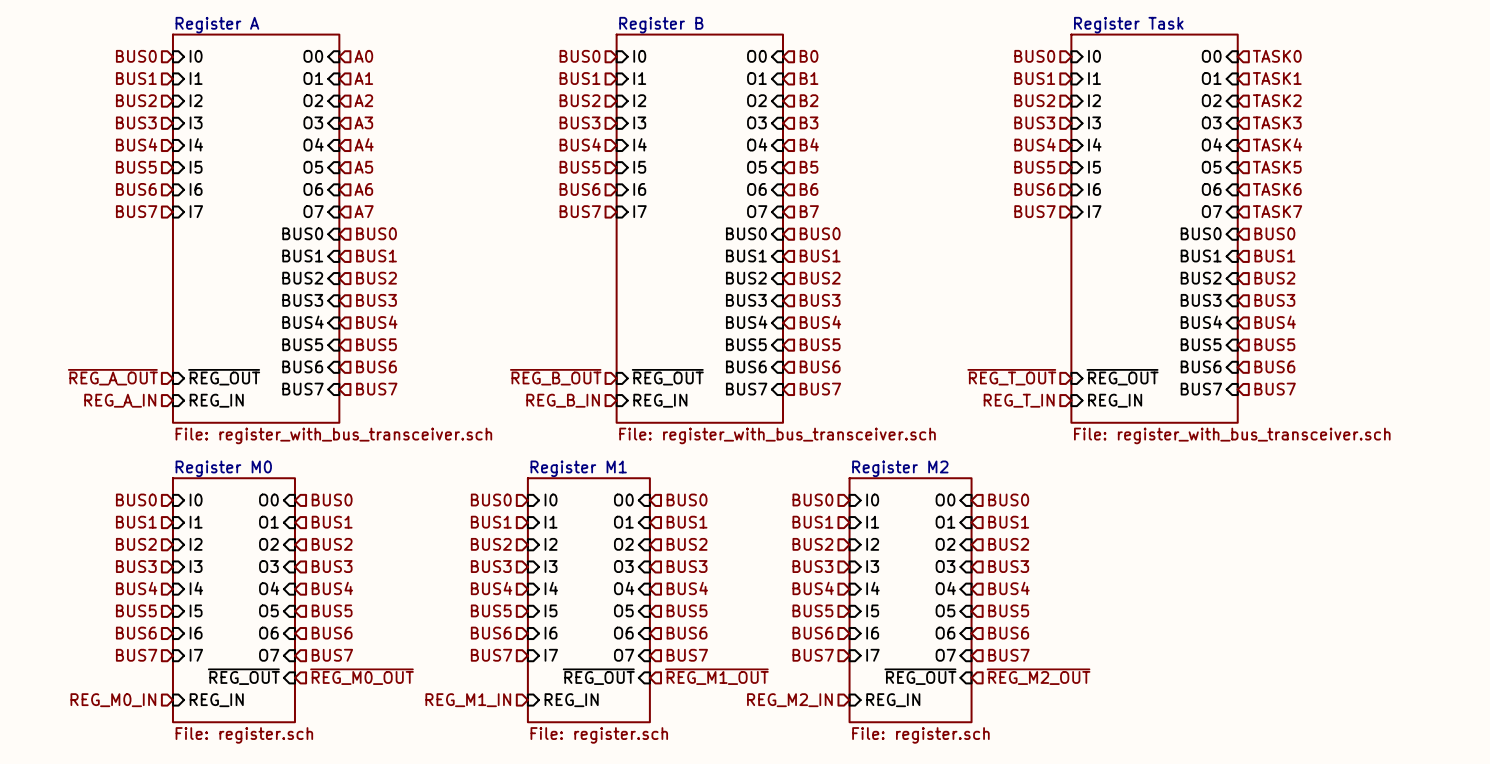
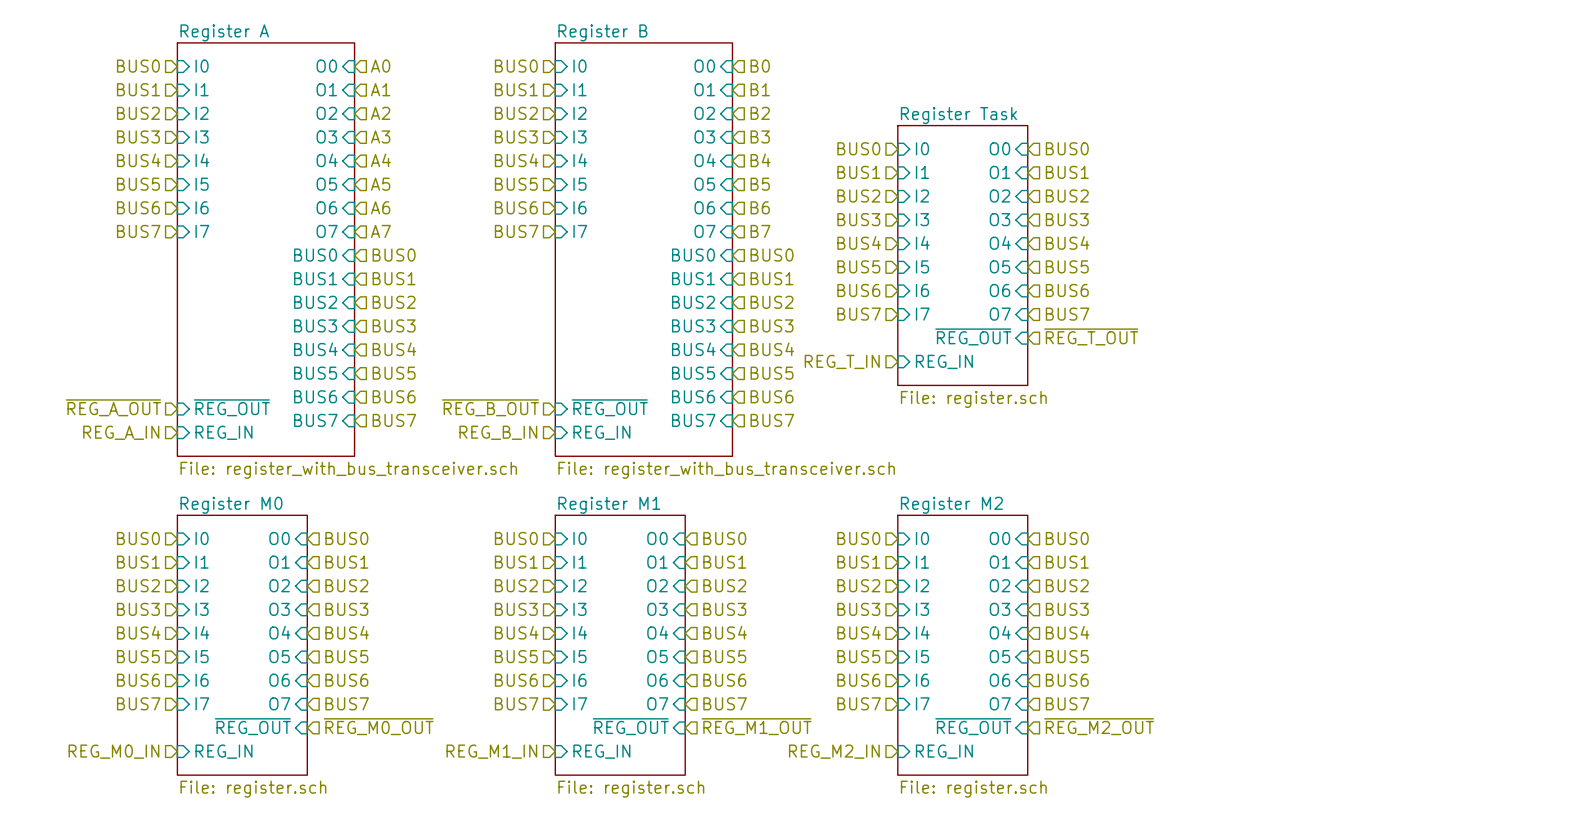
hierarchical label position: BUS0 (580, 56) -> BUS0 (516, 66)
sheet pin position: I0 (639, 56) -> I0 (579, 66)
sheet pin position: O0 (756, 56) -> O0 (704, 66)
hierarchical label position: B0 (809, 56) -> B0 (760, 66)
hierarchical label rotation: 0° (1034, 56) -> 180° (1067, 148)
hierarchical label position: BUS0 (1034, 56) -> BUS0 (1067, 148)
sheet pin: I0 (1094, 56) -> none
sheet pin: O0 (1211, 56) -> none
hierarchical label: TASK0 (1277, 56) -> none
hierarchical label position: BUS1 (580, 78) -> BUS1 (516, 89)
sheet pin position: I1 (639, 78) -> I1 (579, 89)
sheet pin position: O1 (756, 78) -> O1 (704, 89)
hierarchical label position: B1 (809, 78) -> B1 (760, 89)
hierarchical label rotation: 0° (1034, 78) -> 180° (1067, 172)
hierarchical label position: BUS1 (1034, 78) -> BUS1 (1067, 172)
sheet pin: I1 (1094, 78) -> none
sheet pin: O1 (1211, 78) -> none
hierarchical label: TASK1 (1277, 78) -> none
hierarchical label position: BUS2 (580, 100) -> BUS2 (516, 113)
sheet pin position: I2 (639, 100) -> I2 (579, 113)
sheet pin position: O2 (756, 100) -> O2 (704, 113)
hierarchical label position: B2 (809, 100) -> B2 (760, 113)
hierarchical label rotation: 0° (1034, 100) -> 180° (1067, 196)
hierarchical label position: BUS2 (1034, 100) -> BUS2 (1067, 196)
sheet pin: I2 (1094, 100) -> none
sheet pin: O2 (1211, 100) -> none
hierarchical label: TASK2 (1277, 100) -> none
hierarchical label position: BUS3 (580, 122) -> BUS3 (516, 136)
sheet pin position: I3 (639, 122) -> I3 (579, 136)
sheet pin position: O3 (756, 122) -> O3 (704, 136)
hierarchical label position: B3 (809, 122) -> B3 (760, 136)
hierarchical label rotation: 0° (1034, 122) -> 180° (1067, 219)
hierarchical label position: BUS3 (1034, 122) -> BUS3 (1067, 219)
sheet pin: I3 (1094, 122) -> none
sheet pin: O3 (1211, 122) -> none
hierarchical label: TASK3 (1277, 122) -> none
hierarchical label: none -> BUS0 (858, 148)
sheet pin: none -> I0 (922, 148)
sheet pin: none -> O0 (999, 148)
hierarchical label position: BUS4 (580, 144) -> BUS4 (516, 160)
sheet pin position: I4 (640, 144) -> I4 (580, 160)
sheet pin position: O4 (757, 144) -> O4 (705, 160)
hierarchical label position: B4 (809, 144) -> B4 (760, 160)
hierarchical label rotation: 0° (1035, 144) -> 180° (1067, 242)
hierarchical label position: BUS4 (1035, 144) -> BUS4 (1067, 242)
sheet pin: I4 (1094, 144) -> none
sheet pin: O4 (1211, 144) -> none
hierarchical label: TASK4 (1277, 144) -> none
hierarchical label: none -> BUS1 (858, 172)
sheet pin: none -> I1 (922, 172)
sheet pin: none -> O1 (999, 172)
hierarchical label position: BUS5 (580, 167) -> BUS5 (516, 184)
sheet pin position: I5 (639, 167) -> I5 (579, 184)
sheet pin position: O5 (756, 167) -> O5 (704, 184)
hierarchical label position: B5 (809, 167) -> B5 (760, 184)
hierarchical label rotation: 0° (1034, 167) -> 180° (1067, 266)
hierarchical label position: BUS5 (1034, 167) -> BUS5 (1067, 266)
sheet pin: I5 (1094, 167) -> none
sheet pin: O5 (1211, 167) -> none
hierarchical label: TASK5 (1277, 167) -> none
hierarchical label: none -> BUS2 (858, 196)
sheet pin: none -> I2 (922, 196)
sheet pin: none -> O2 (999, 196)
hierarchical label position: BUS6 (580, 189) -> BUS6 (516, 207)
sheet pin position: I6 (639, 189) -> I6 (579, 207)
sheet pin position: O6 (756, 189) -> O6 (704, 207)
hierarchical label position: B6 (809, 189) -> B6 (760, 207)
hierarchical label rotation: 0° (1034, 189) -> 180° (1067, 290)
hierarchical label position: BUS6 (1034, 189) -> BUS6 (1067, 290)
sheet pin: I6 (1094, 189) -> none
sheet pin: O6 (1211, 189) -> none
hierarchical label: TASK6 (1277, 189) -> none
hierarchical label: none -> BUS3 (858, 219)
sheet pin: none -> I3 (922, 219)
sheet pin: none -> O3 (999, 219)
hierarchical label position: BUS7 (580, 211) -> BUS7 (516, 231)
sheet pin position: I7 (640, 211) -> I7 (580, 231)
sheet pin position: O7 (757, 211) -> O7 (705, 231)
hierarchical label position: B7 (809, 211) -> B7 (760, 231)
hierarchical label rotation: 0° (1035, 211) -> 180° (1067, 314)
hierarchical label position: BUS7 (1035, 211) -> BUS7 (1067, 314)
sheet pin: I7 (1094, 211) -> none
sheet pin: O7 (1211, 211) -> none
hierarchical label: TASK7 (1277, 211) -> none
hierarchical label: none -> BUS4 (859, 242)
sheet pin: none -> I4 (922, 242)
sheet pin: none -> O4 (1000, 242)
sheet Register B position: (699, 228) -> (643, 249)
sheet Register Task: File: register_with_bus_transceiver.sch (1154, 228) -> none
hierarchical label: none -> BUS0 (772, 255)
sheet pin position: BUS0 (746, 233) -> BUS0 (693, 255)
hierarchical label: BUS0 (820, 233) -> none
sheet pin: BUS0 (1201, 233) -> none
hierarchical label: BUS0 (1274, 233) -> none
sheet Register Task: none -> File: register.sch (962, 255)
hierarchical label: none -> BUS5 (858, 266)
sheet pin: none -> I5 (922, 266)
sheet pin: none -> O5 (999, 266)
hierarchical label: none -> BUS1 (772, 278)
sheet pin position: BUS1 (746, 255) -> BUS1 (693, 278)
hierarchical label: BUS1 (820, 255) -> none
sheet pin: BUS1 (1201, 255) -> none
hierarchical label: BUS1 (1274, 255) -> none
hierarchical label: none -> BUS6 (858, 290)
sheet pin: none -> I6 (922, 290)
sheet pin: none -> O6 (999, 290)
hierarchical label: none -> BUS2 (772, 302)
sheet pin position: BUS2 (746, 278) -> BUS2 (693, 302)
hierarchical label: BUS2 (820, 278) -> none
sheet pin: BUS2 (1201, 278) -> none
hierarchical label: BUS2 (1274, 278) -> none
hierarchical label: none -> BUS7 (859, 314)
sheet pin: none -> I7 (922, 314)
sheet pin: none -> O7 (1000, 314)
hierarchical label: none -> BUS3 (772, 325)
sheet pin position: BUS3 (746, 300) -> BUS3 (693, 325)
hierarchical label: BUS3 (820, 300) -> none
sheet pin: BUS3 (1201, 300) -> none
hierarchical label: BUS3 (1274, 300) -> none
hierarchical label: none -> BUS4 (772, 349)
sheet pin position: BUS4 (746, 322) -> BUS4 (693, 349)
hierarchical label: BUS4 (820, 322) -> none
sheet pin: BUS4 (1201, 322) -> none
hierarchical label: BUS4 (1275, 322) -> none
hierarchical label: none -> REG_T_IN (842, 361)
sheet pin: none -> REG_IN (944, 361)
hierarchical label: none -> BUS5 (772, 373)
sheet pin position: BUS5 (746, 344) -> BUS5 (693, 373)
hierarchical label: BUS5 (820, 344) -> none
sheet pin: BUS5 (1201, 344) -> none
hierarchical label: BUS5 (1274, 344) -> none
hierarchical label: none -> BUS6 (772, 396)
sheet pin position: BUS6 (746, 366) -> BUS6 (693, 396)
hierarchical label: BUS6 (820, 366) -> none
sheet pin: BUS6 (1201, 366) -> none
hierarchical label: BUS6 (1274, 366) -> none
hierarchical label position: ~{REG_B_OUT} (555, 377) -> ~{REG_B_OUT} (490, 407)
sheet pin position: ~{REG_OUT} (667, 377) -> ~{REG_OUT} (609, 407)
hierarchical label rotation: 0° (1011, 377) -> 180° (1091, 336)
sheet pin rotation: 0° (1122, 377) -> 180° (973, 336)
sheet pin position: ~{REG_OUT} (1122, 377) -> ~{REG_OUT} (973, 336)
hierarchical label: none -> BUS7 (772, 420)
sheet pin position: BUS7 (746, 389) -> BUS7 (693, 420)
hierarchical label: BUS7 (820, 389) -> none
sheet pin: BUS7 (1201, 389) -> none
hierarchical label: BUS7 (1275, 389) -> none
hierarchical label position: REG_B_IN (563, 400) -> REG_B_IN (498, 432)
sheet pin position: REG_IN (660, 400) -> REG_IN (601, 432)
hierarchical label: REG_T_IN (1019, 400) -> none
sheet pin: REG_IN (1115, 400) -> none

